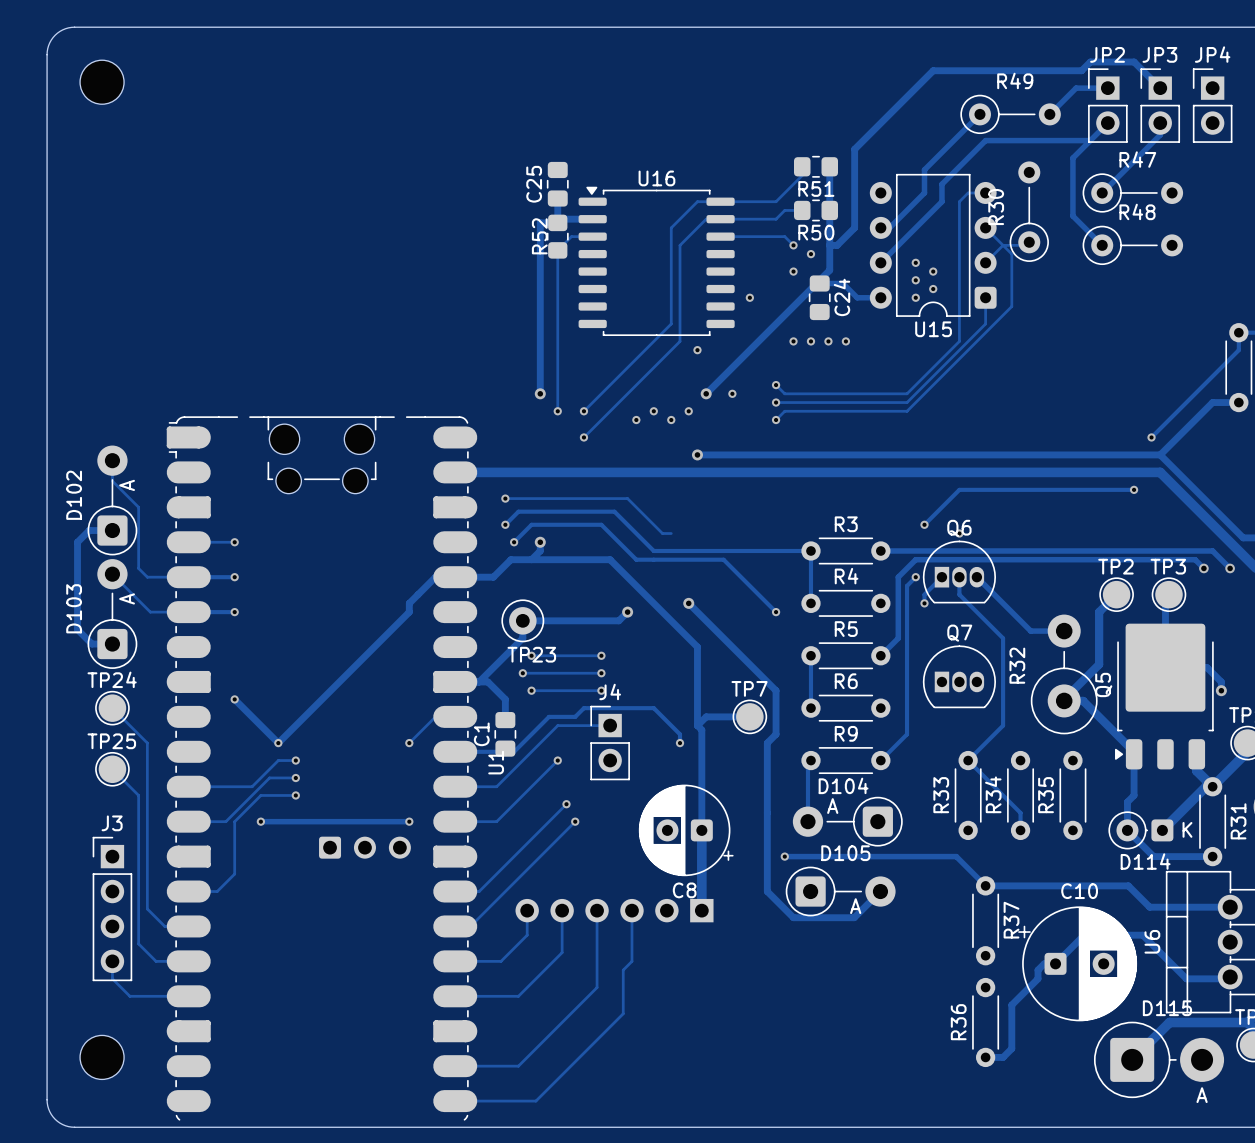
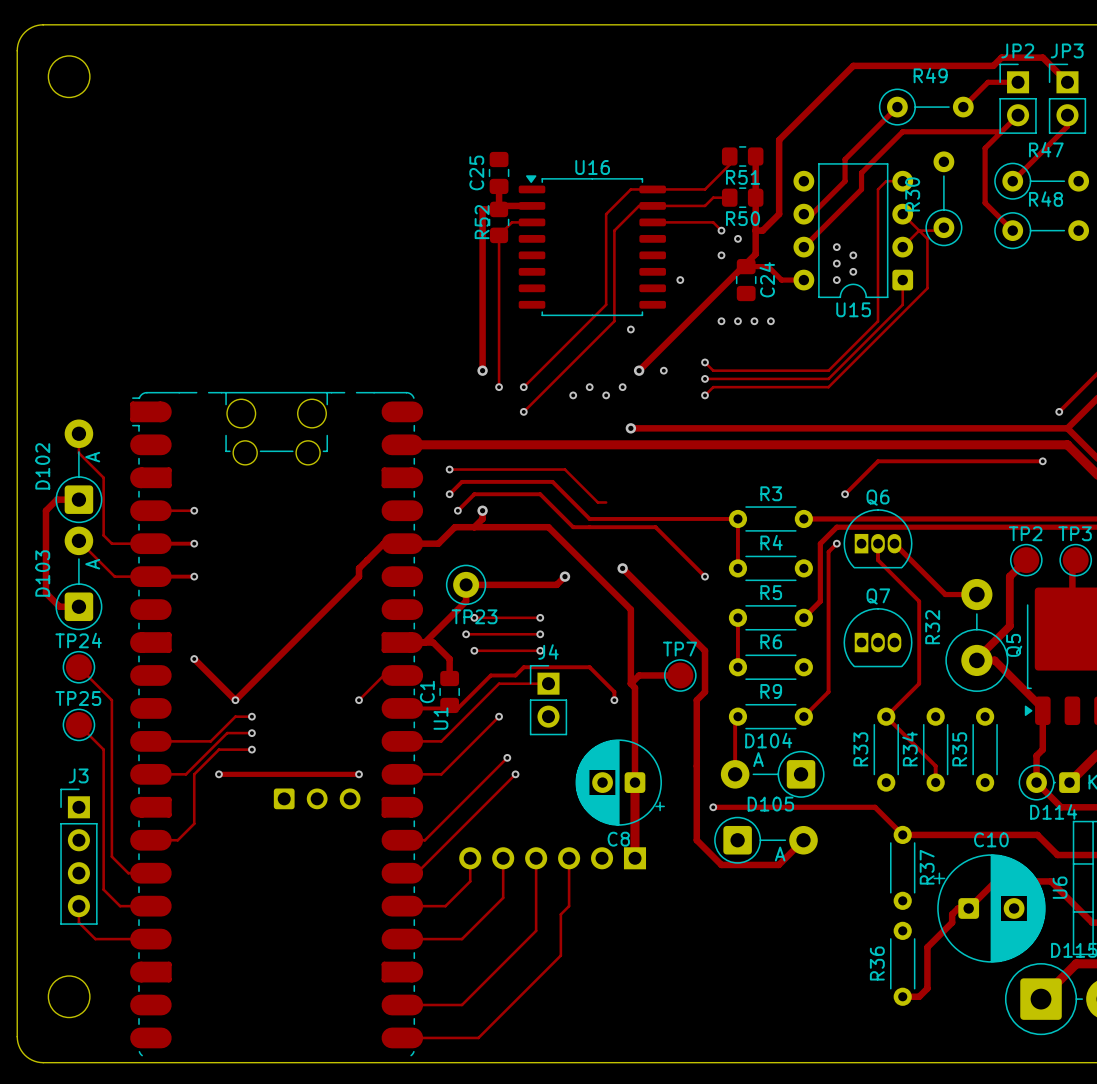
via: (959, 533) -> none
track: (941, 577) (924, 594) (924, 603) -> none
via: (924, 603) -> none

